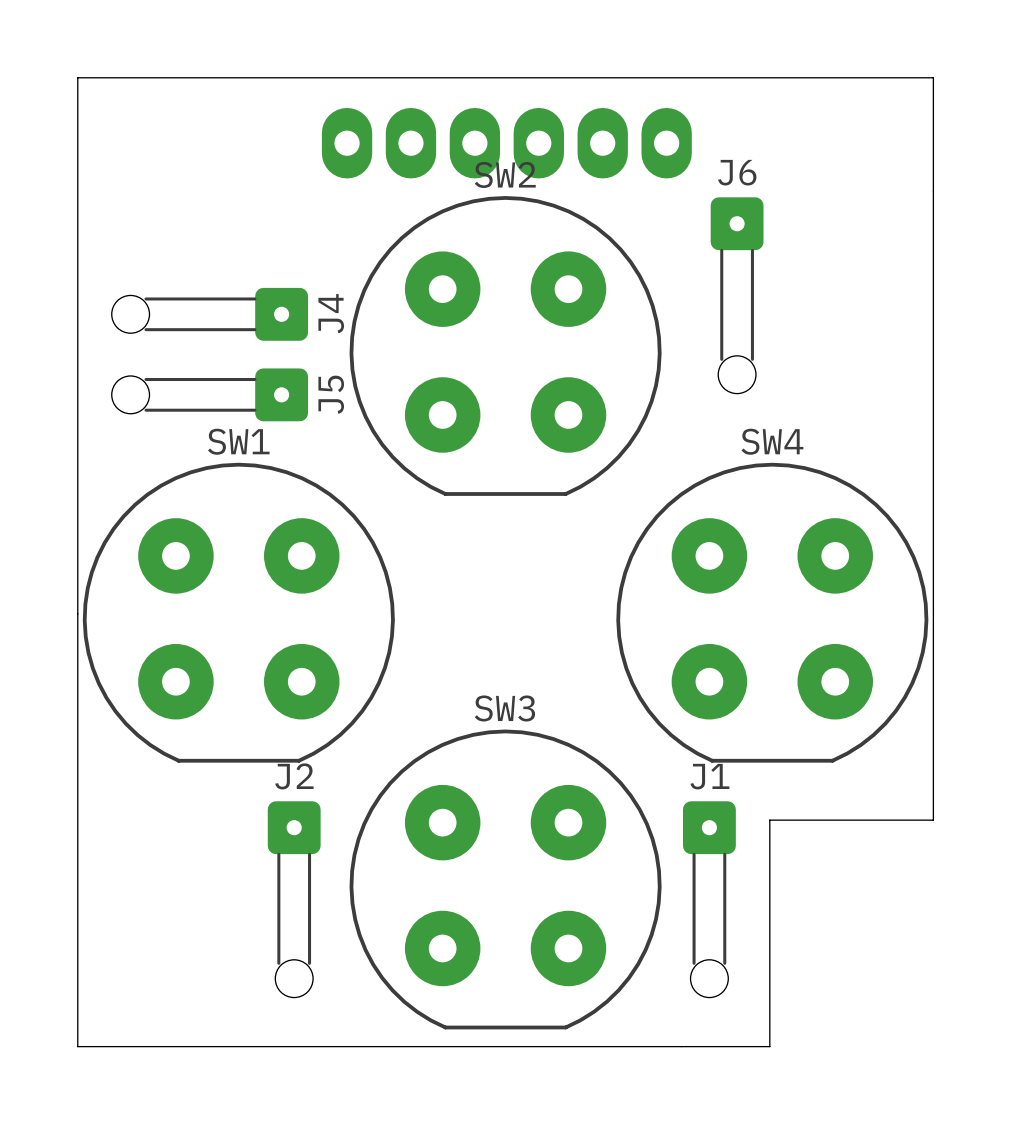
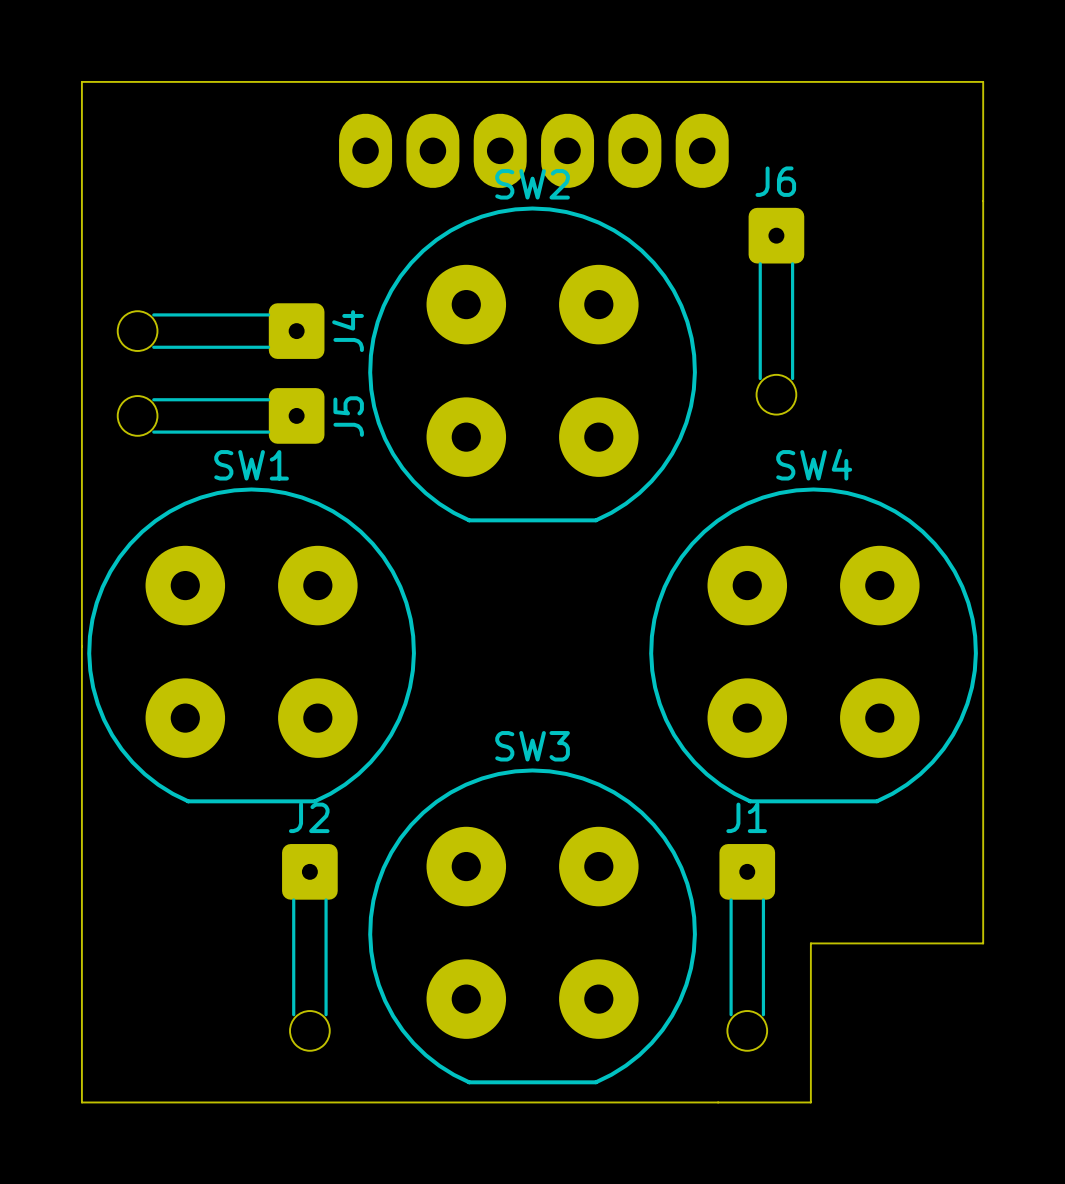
board edge: (933, 820) (769, 820) (769, 895) -> (983, 863) (983, 943) (810, 943)

